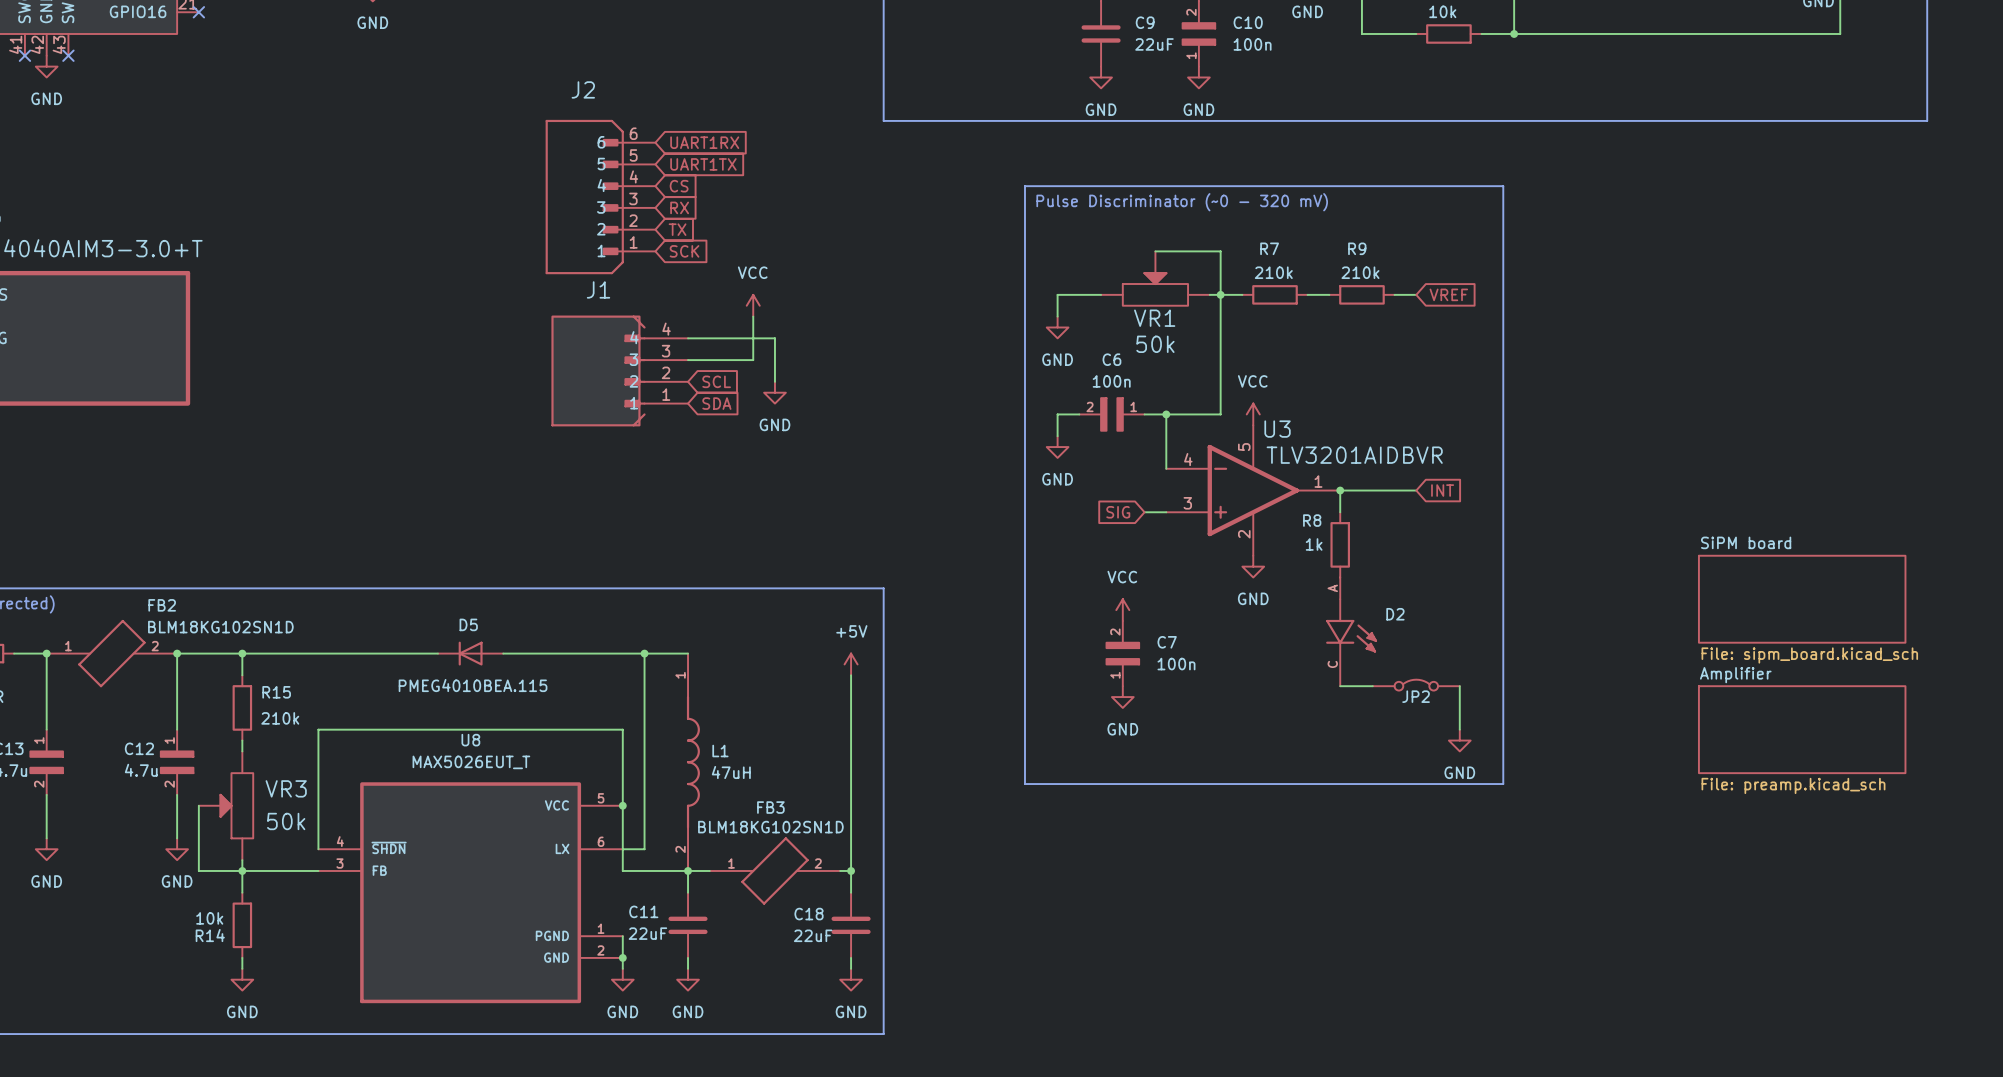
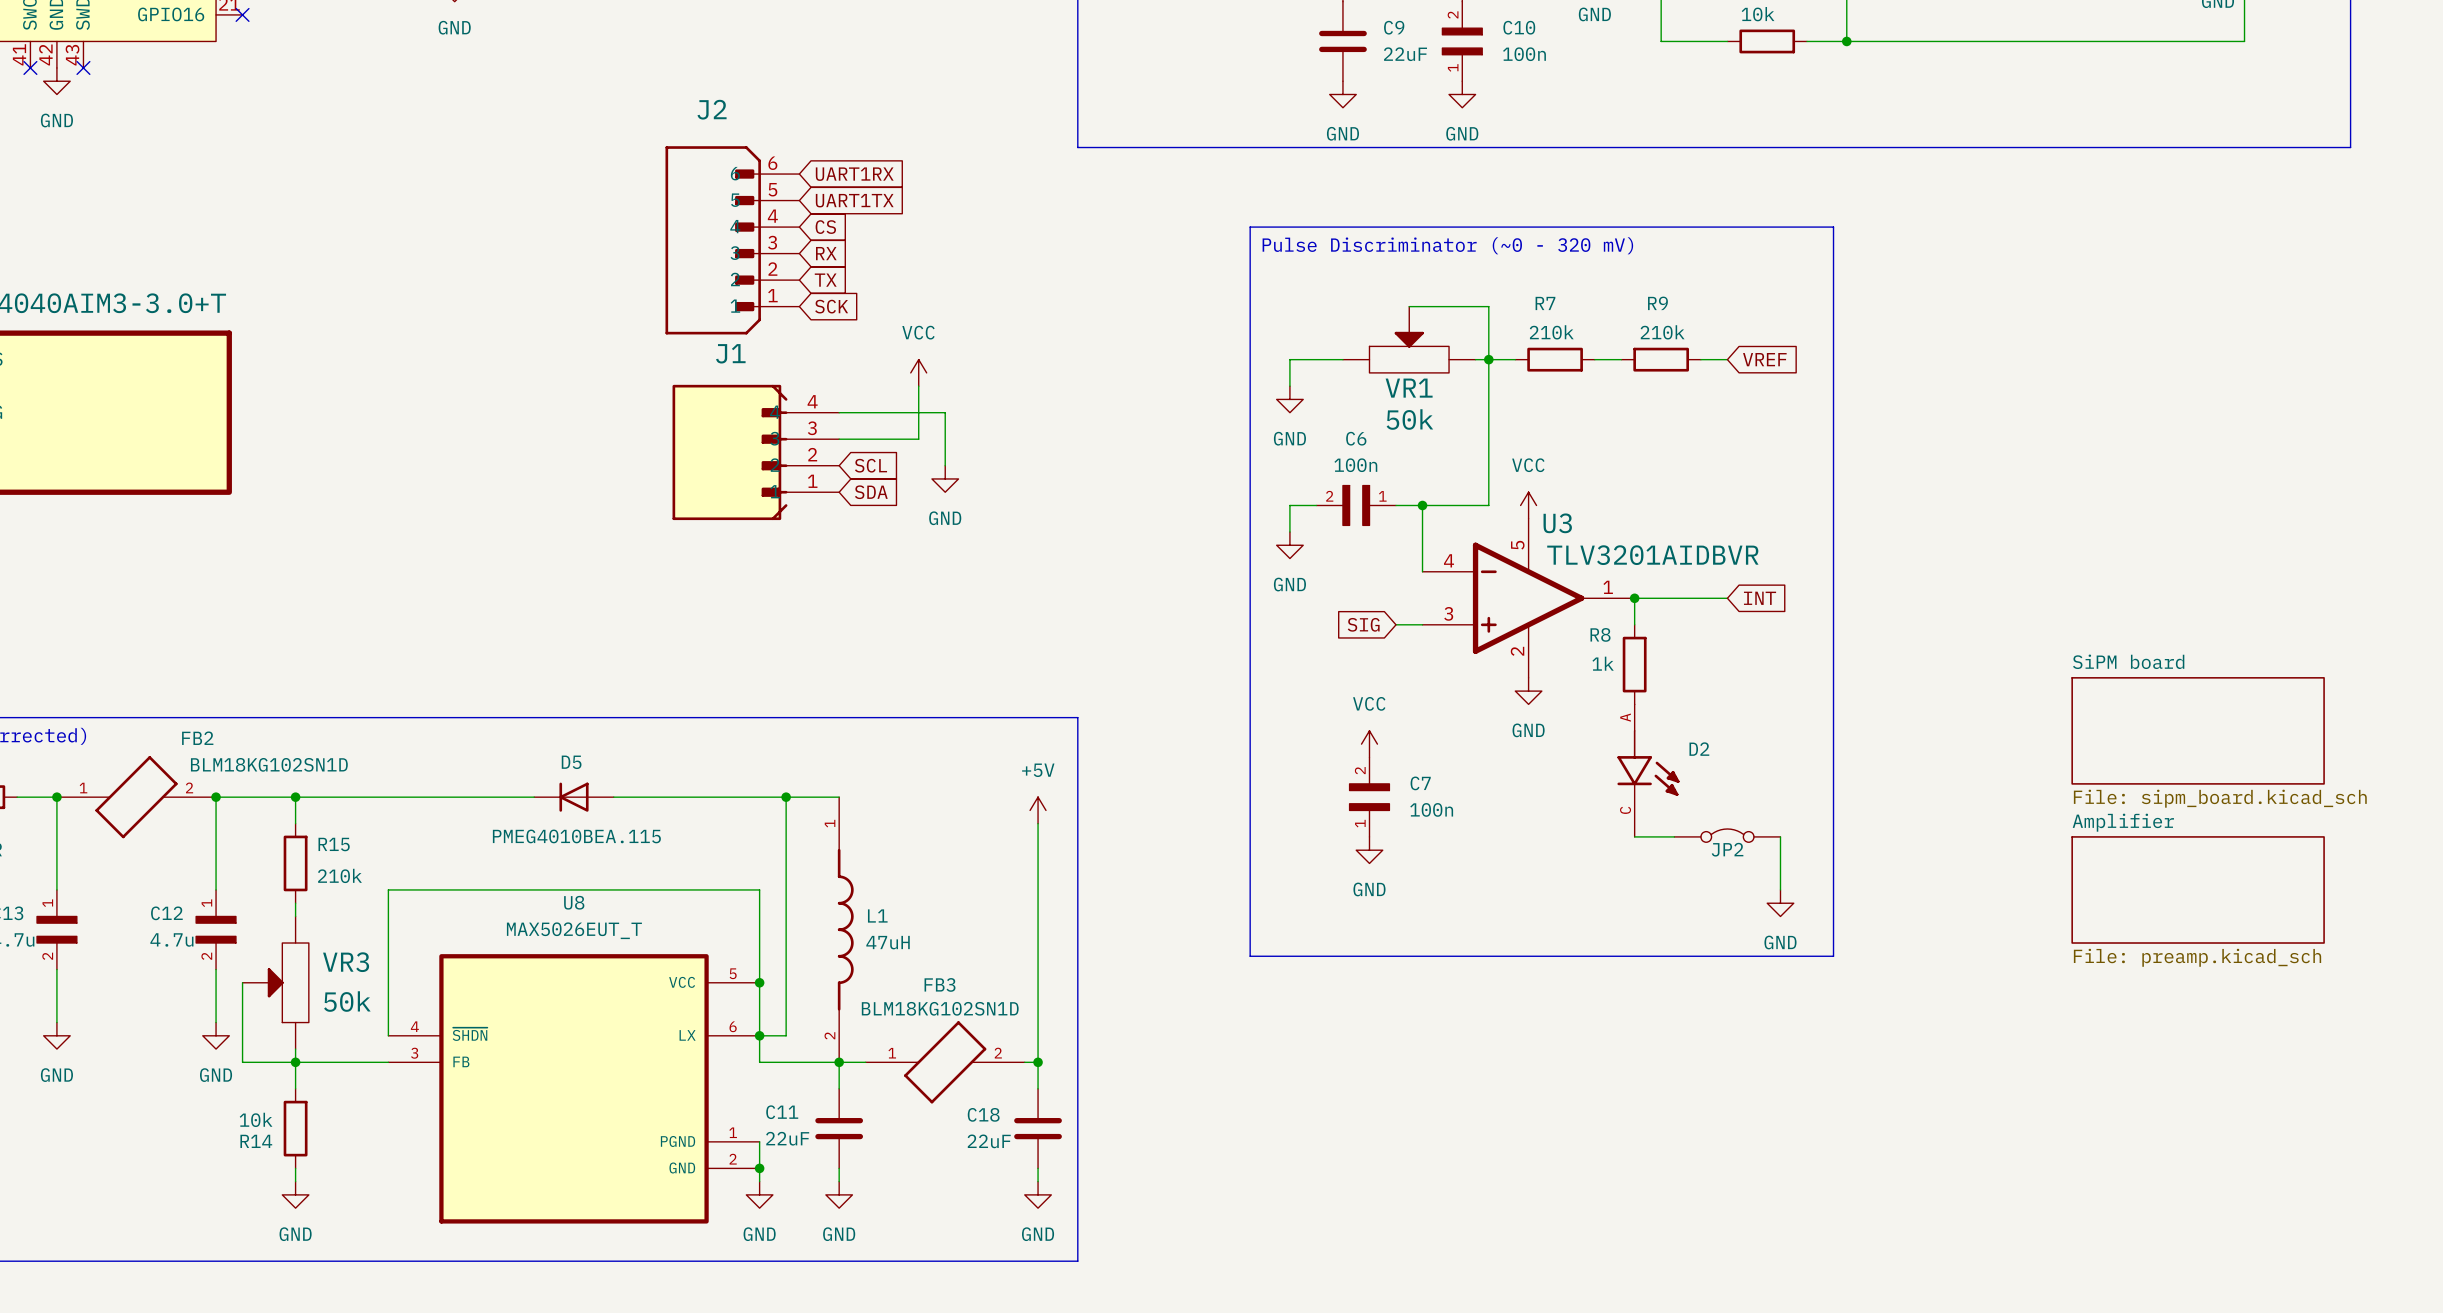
junction: none -> (759, 1035)

